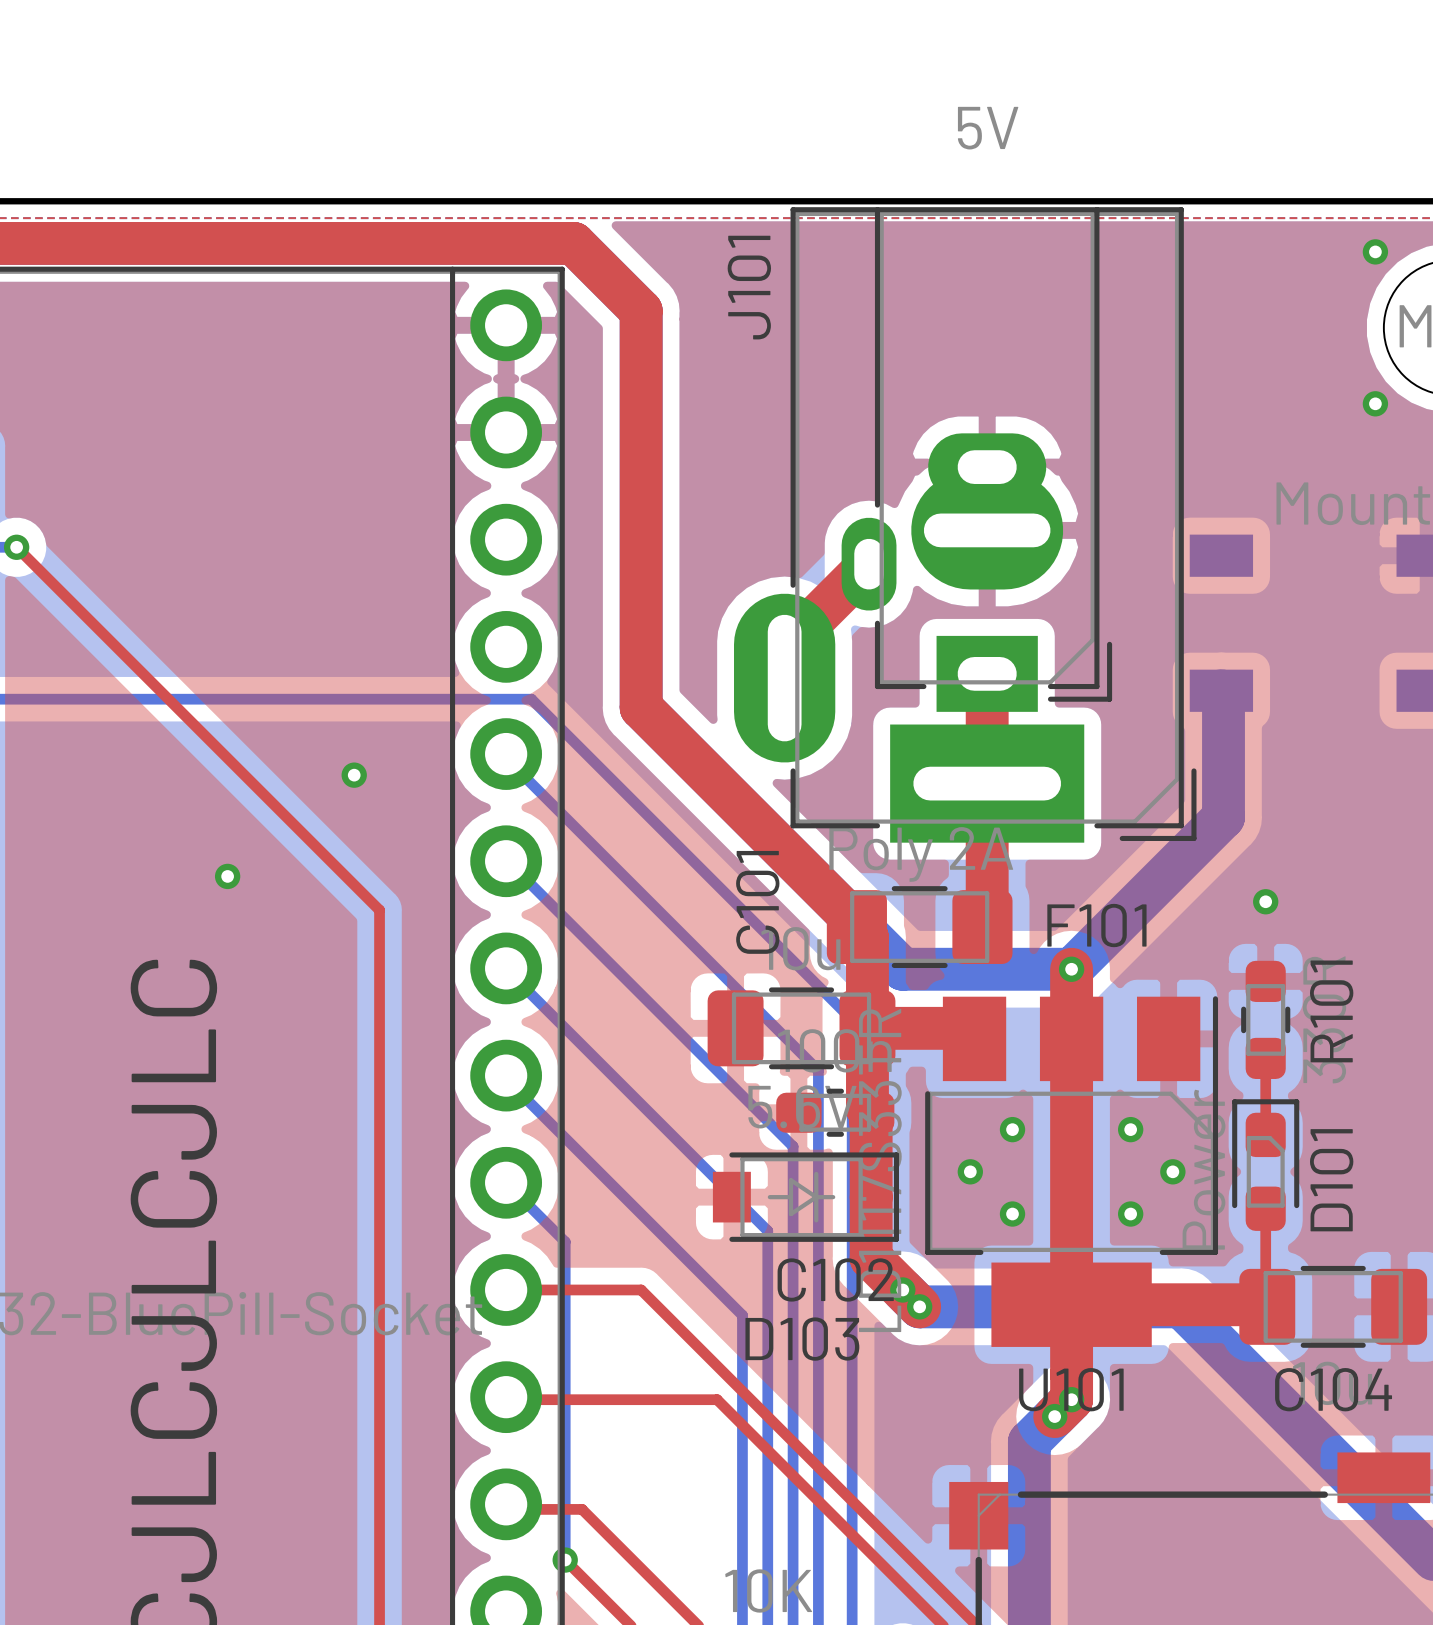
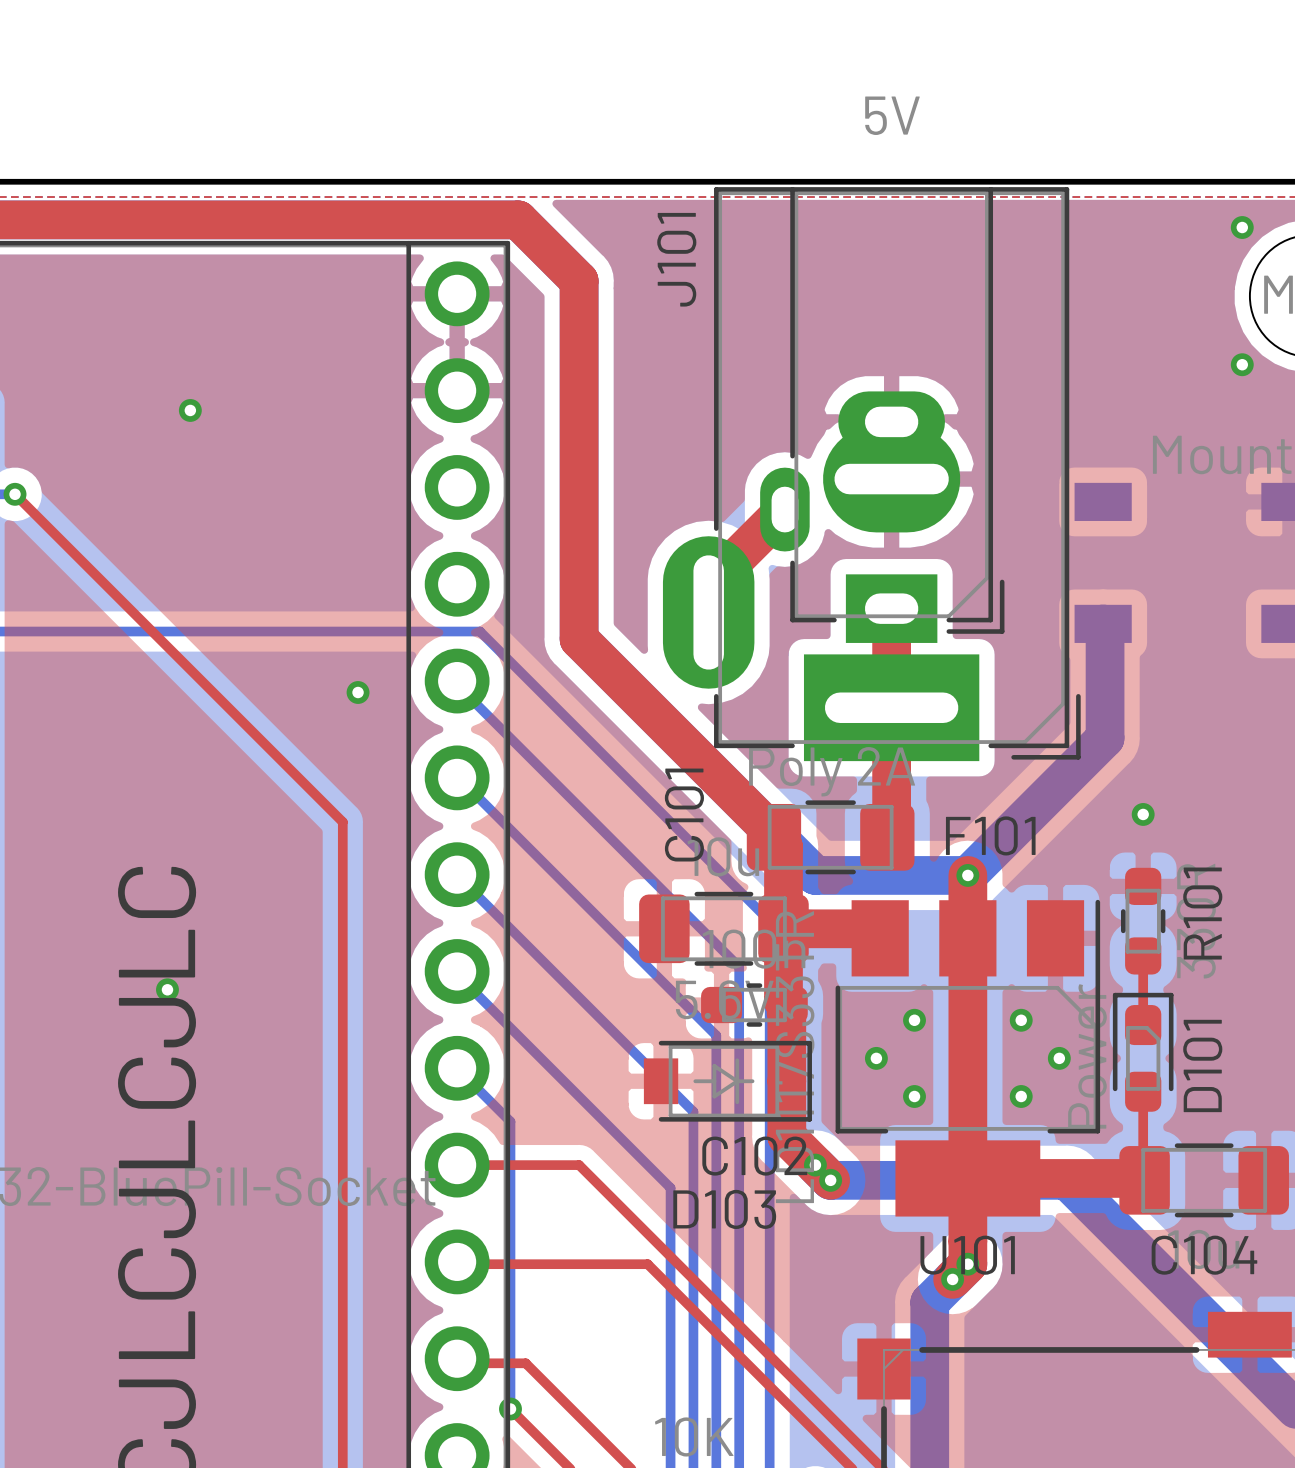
via: none -> (190, 410)
via position: (354, 775) -> (358, 692)
via: (227, 876) -> none
via: none -> (167, 989)

